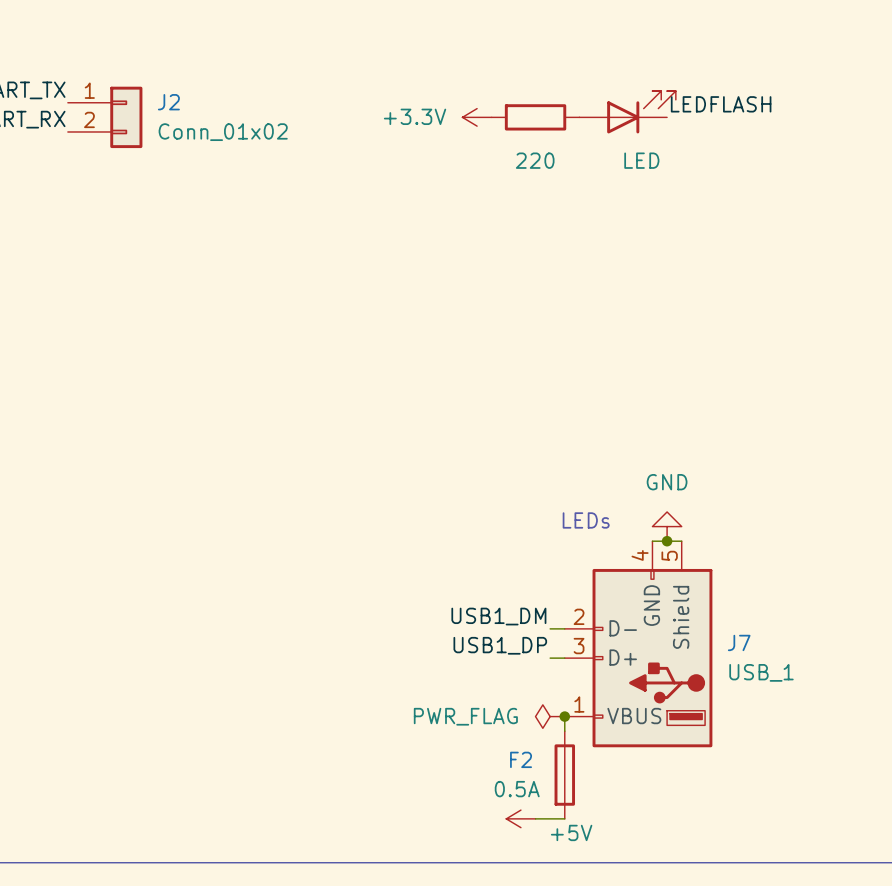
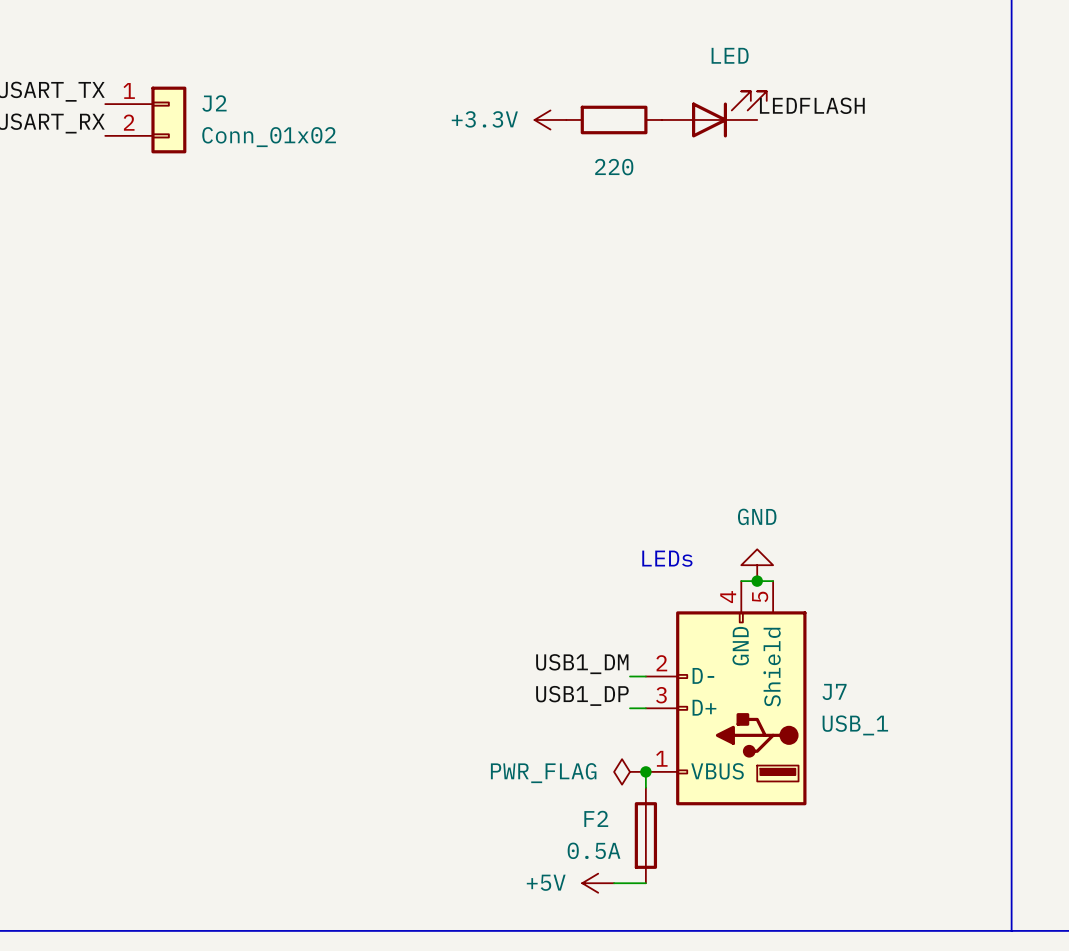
part value position: LED (641, 160) -> LED (730, 55)
power symbol text position: +5V (571, 832) -> +5V (546, 882)

